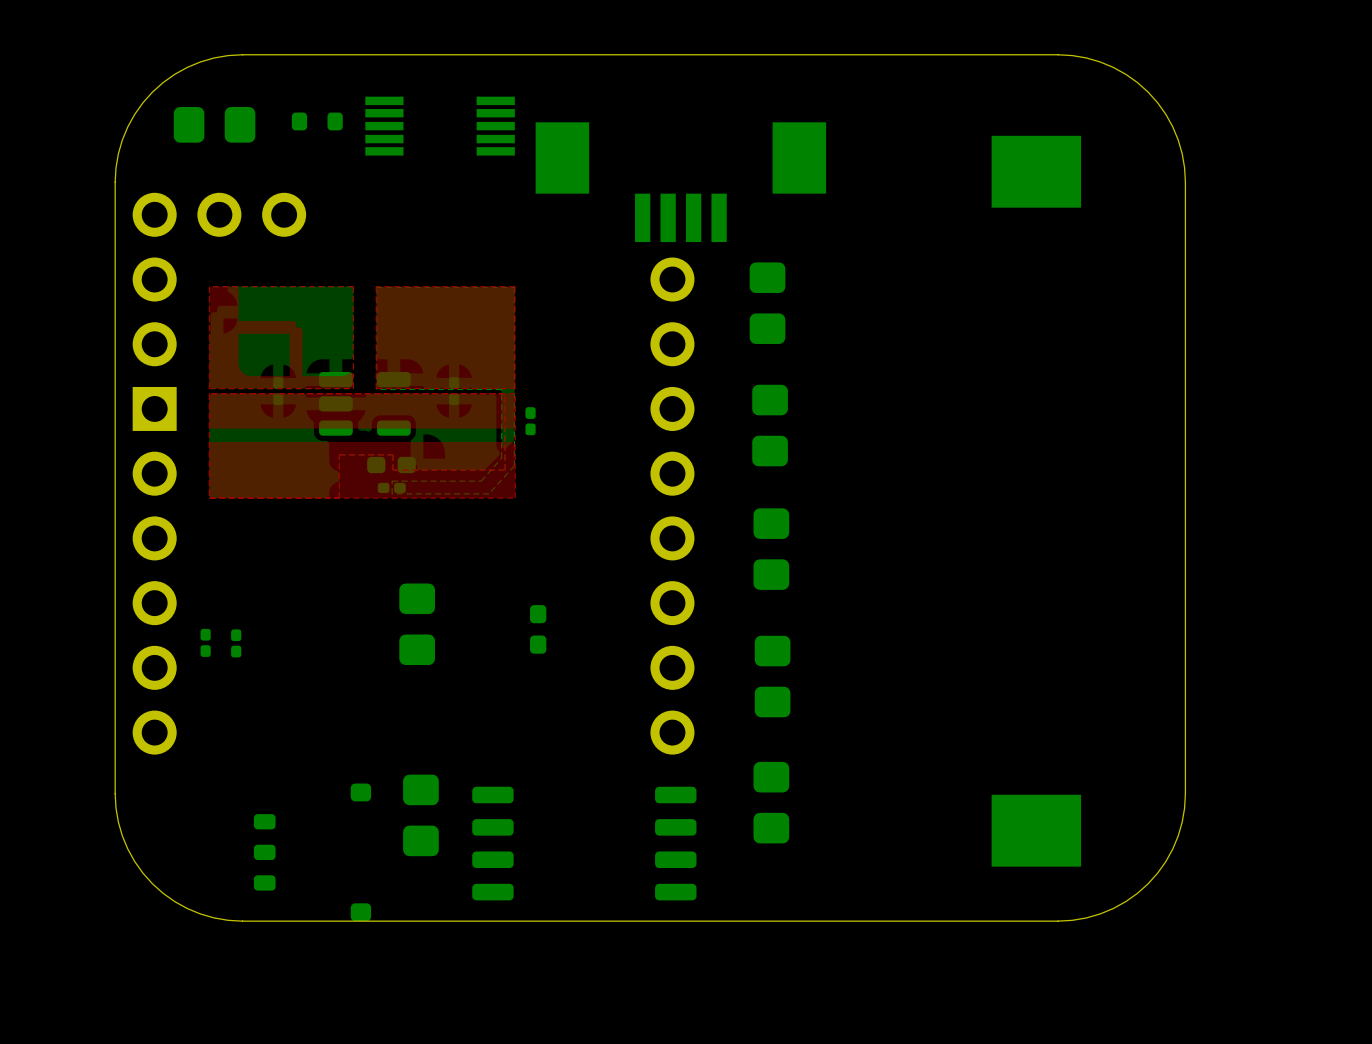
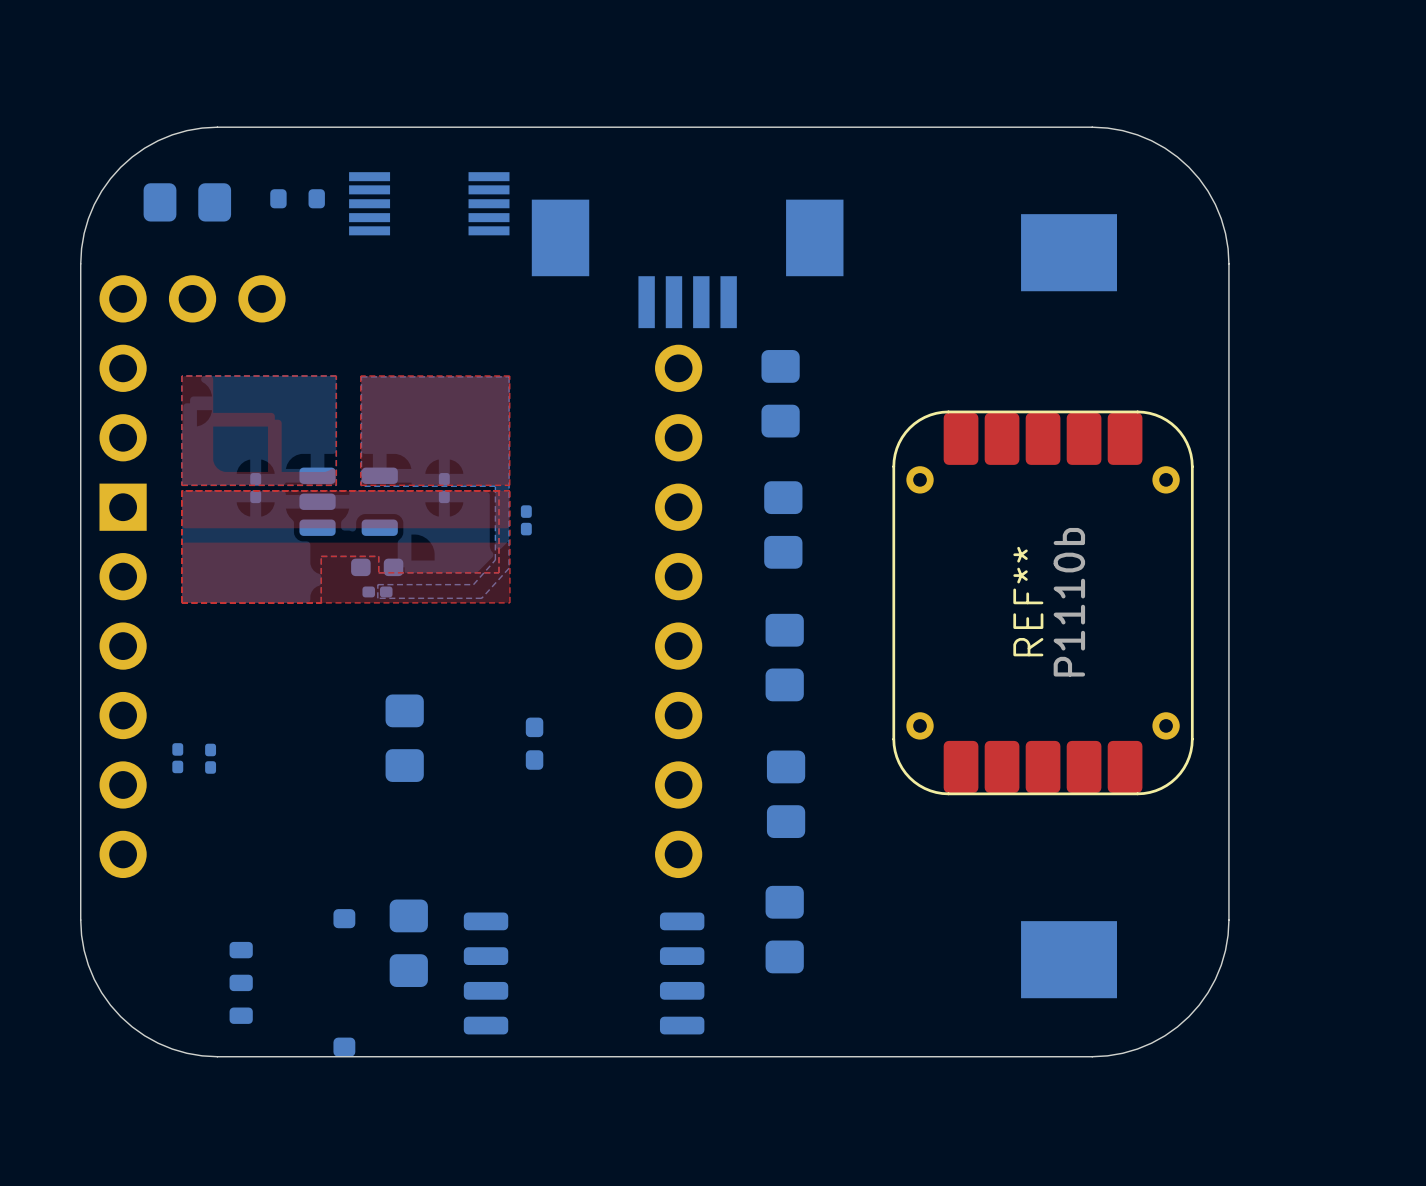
REF**: none -> P1110b (1043, 602)

